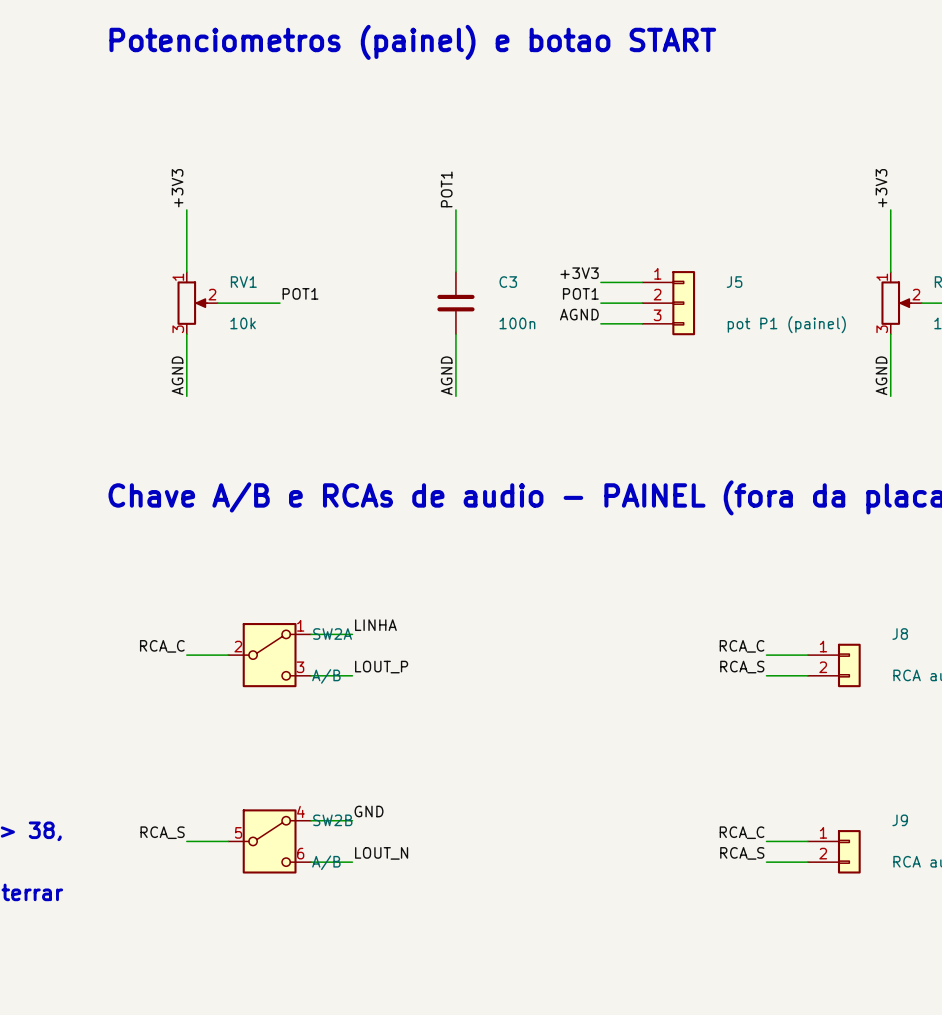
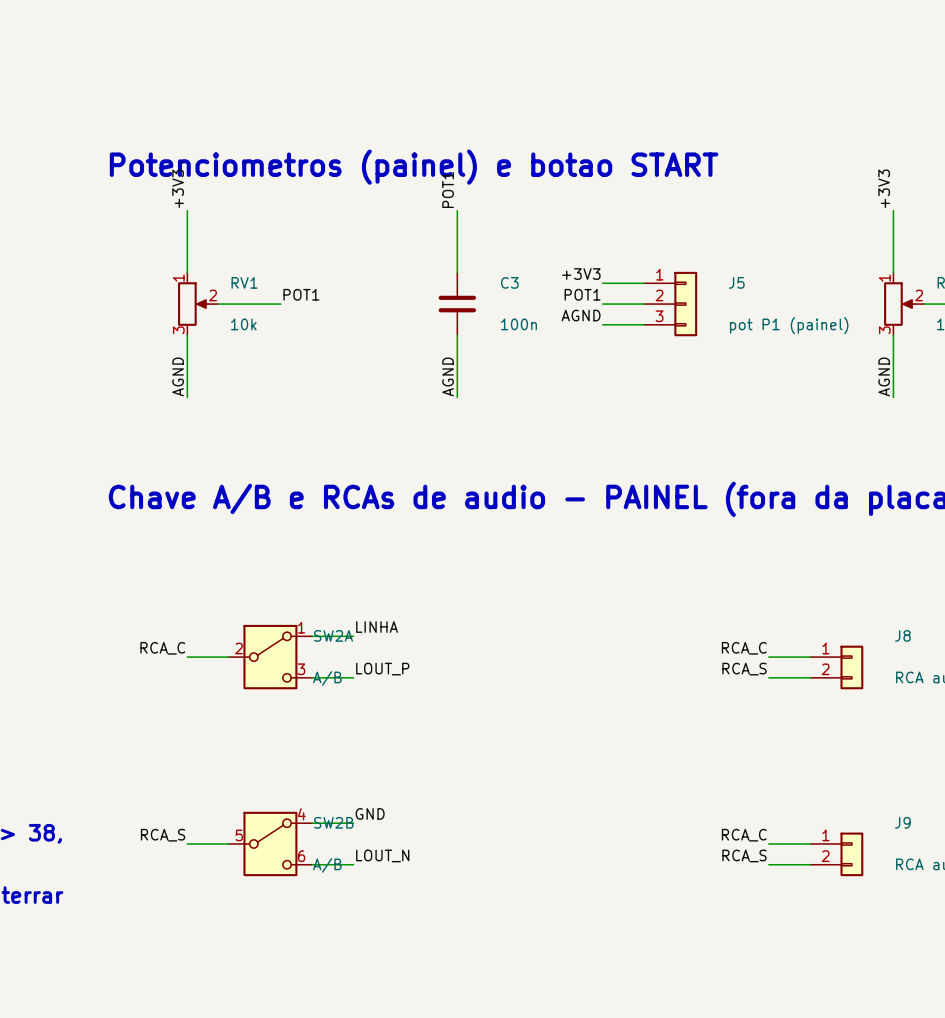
text position: Potenciometros (painel) e botao START (412, 42) -> Potenciometros (painel) e botao START (414, 167)

